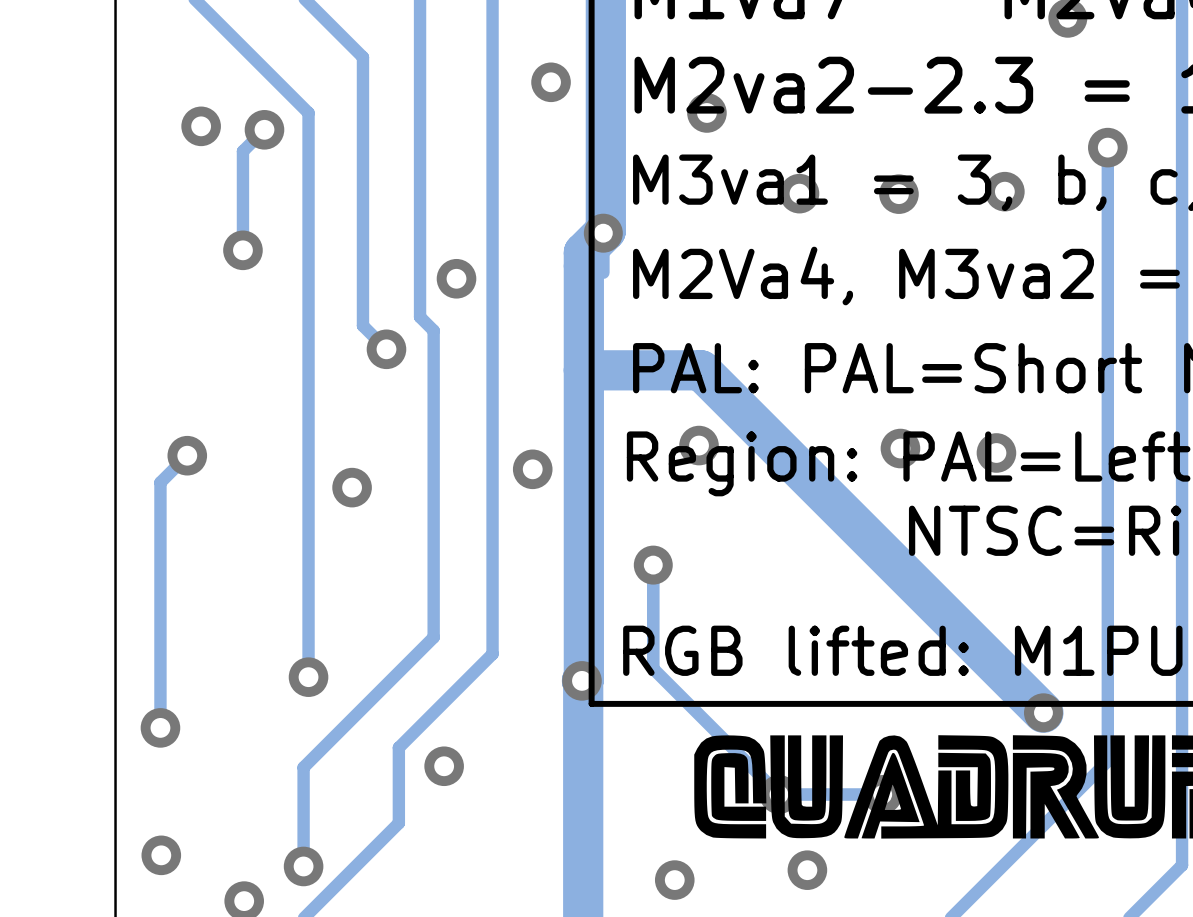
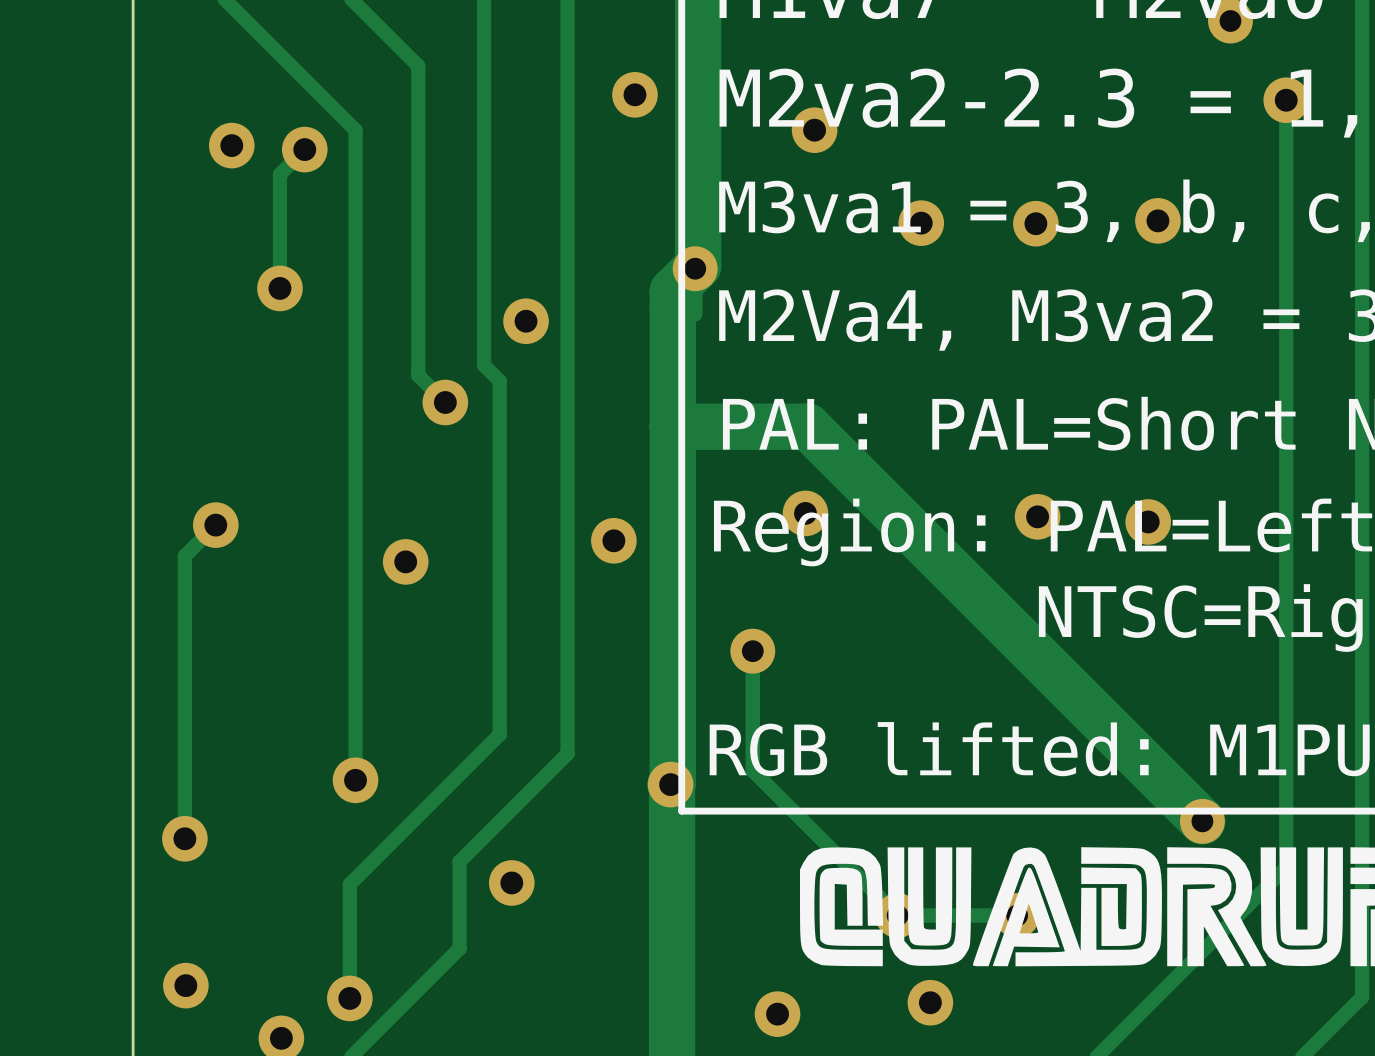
track: (1107, 147) (1107, 761) -> (1286, 100) (1286, 867) (1276, 877)
via position: (1107, 147) -> (1286, 100)

